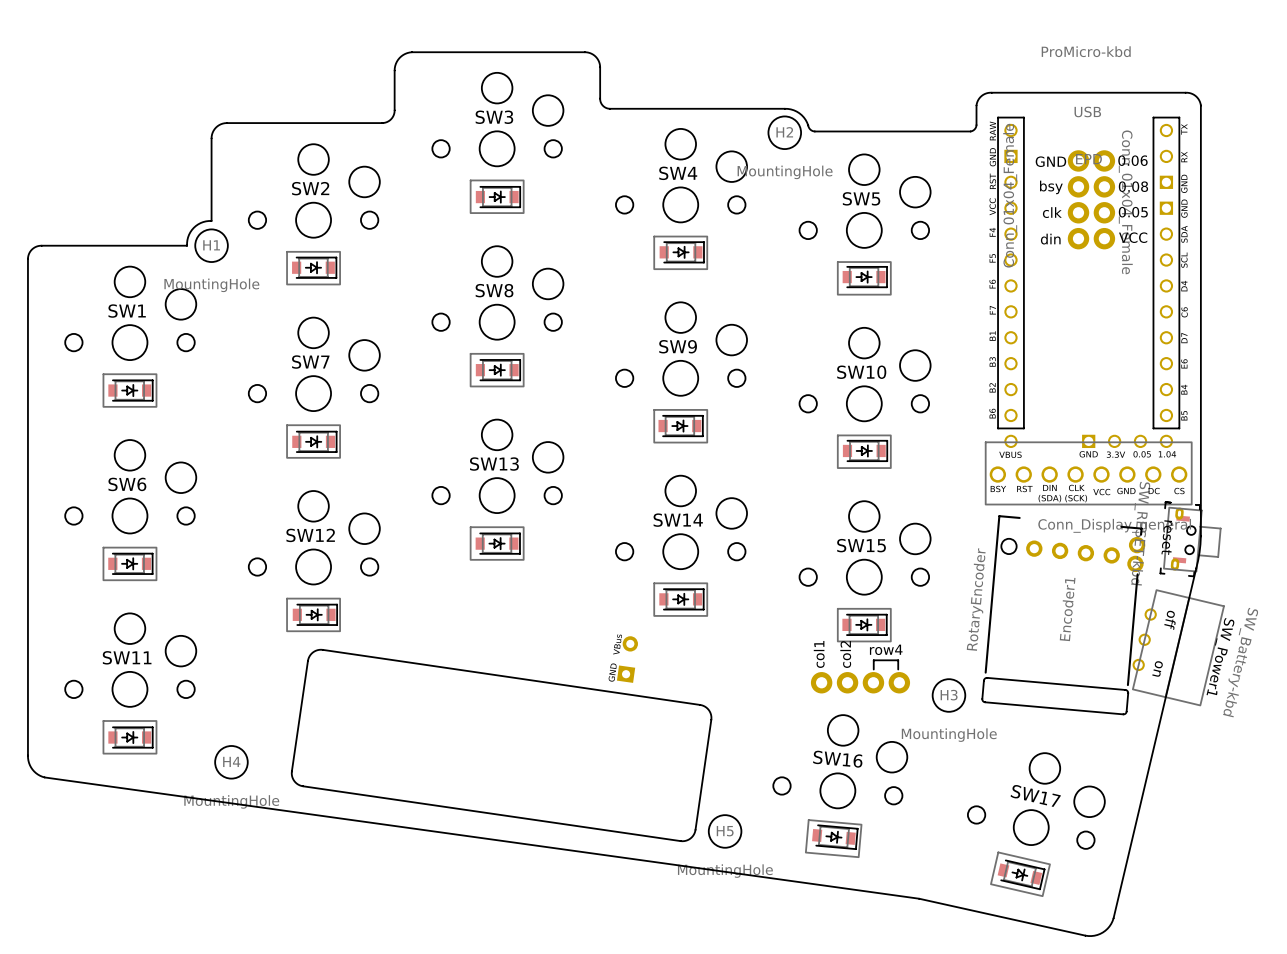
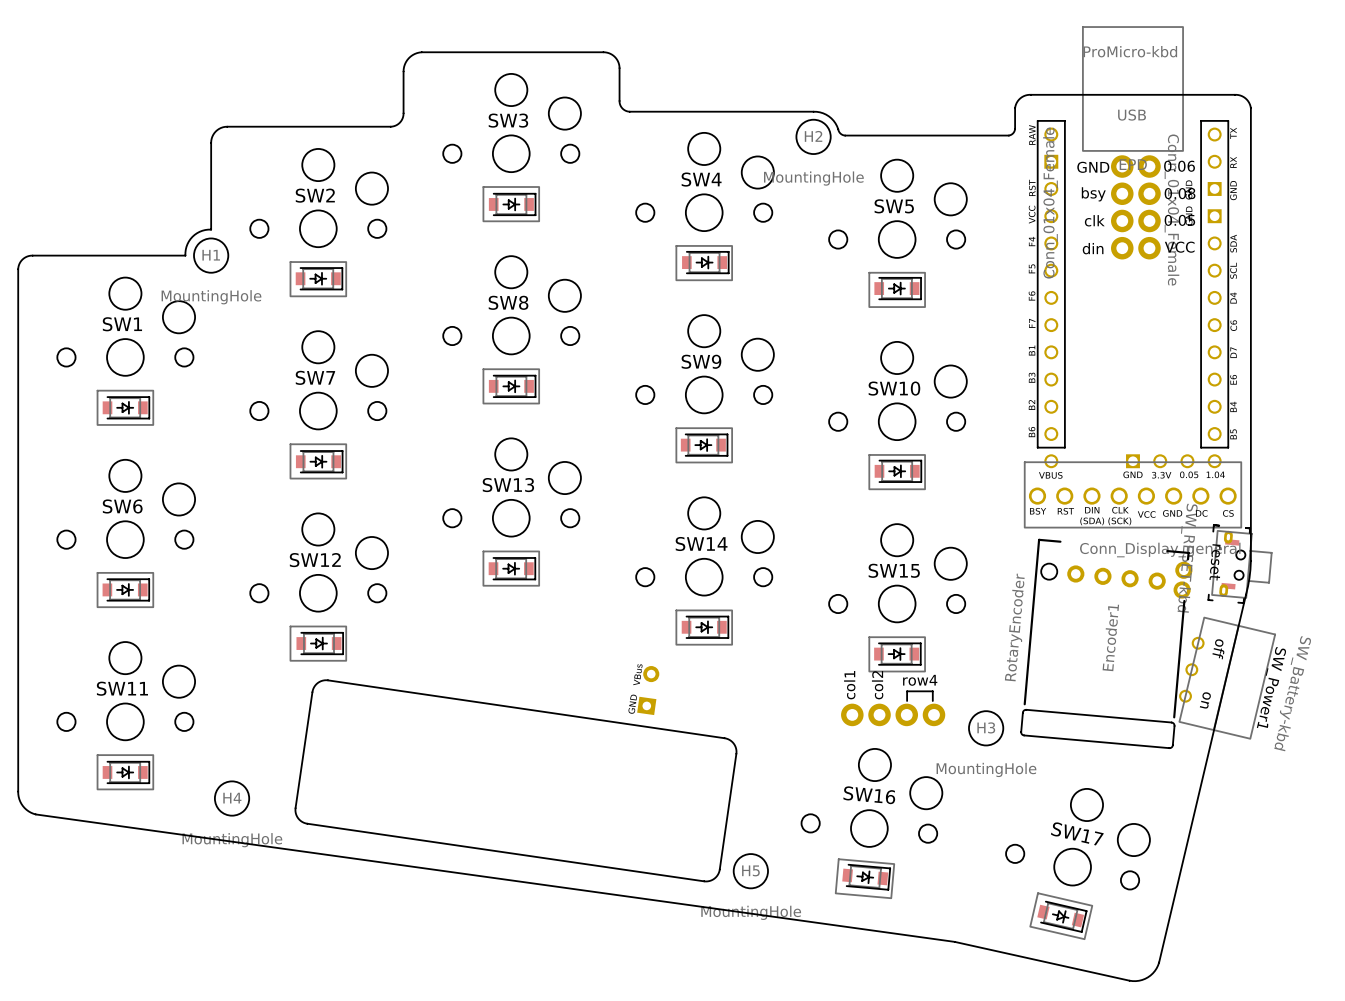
part: none -> ProMicro-kbd (1132, 247)
part: ProMicro-kbd (1088, 282) -> none

